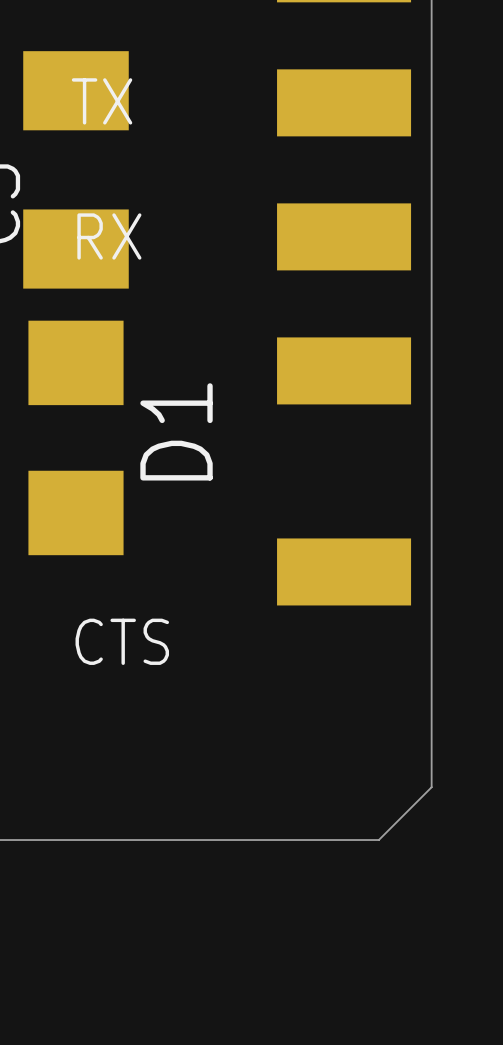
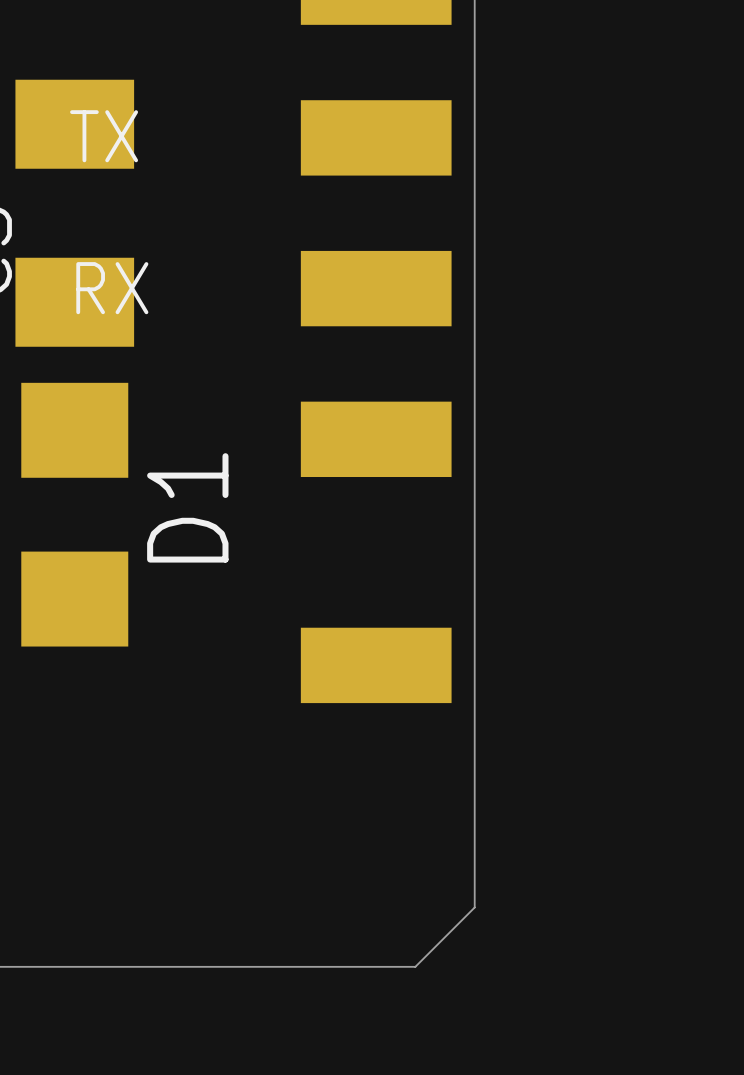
text: CTS (122, 641) -> none

